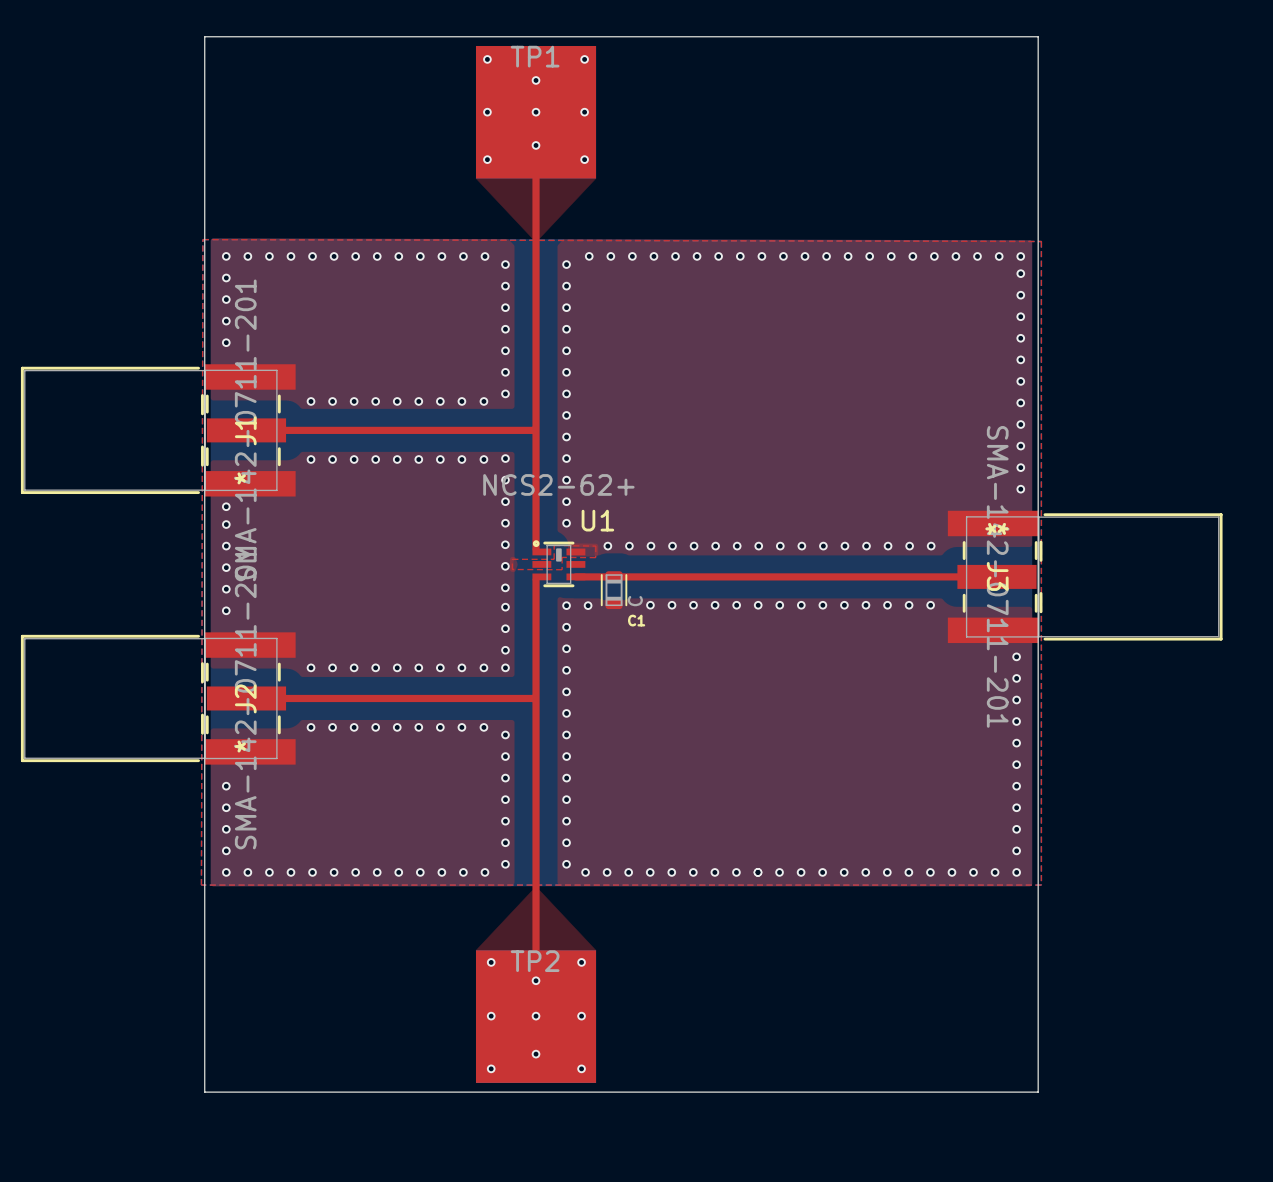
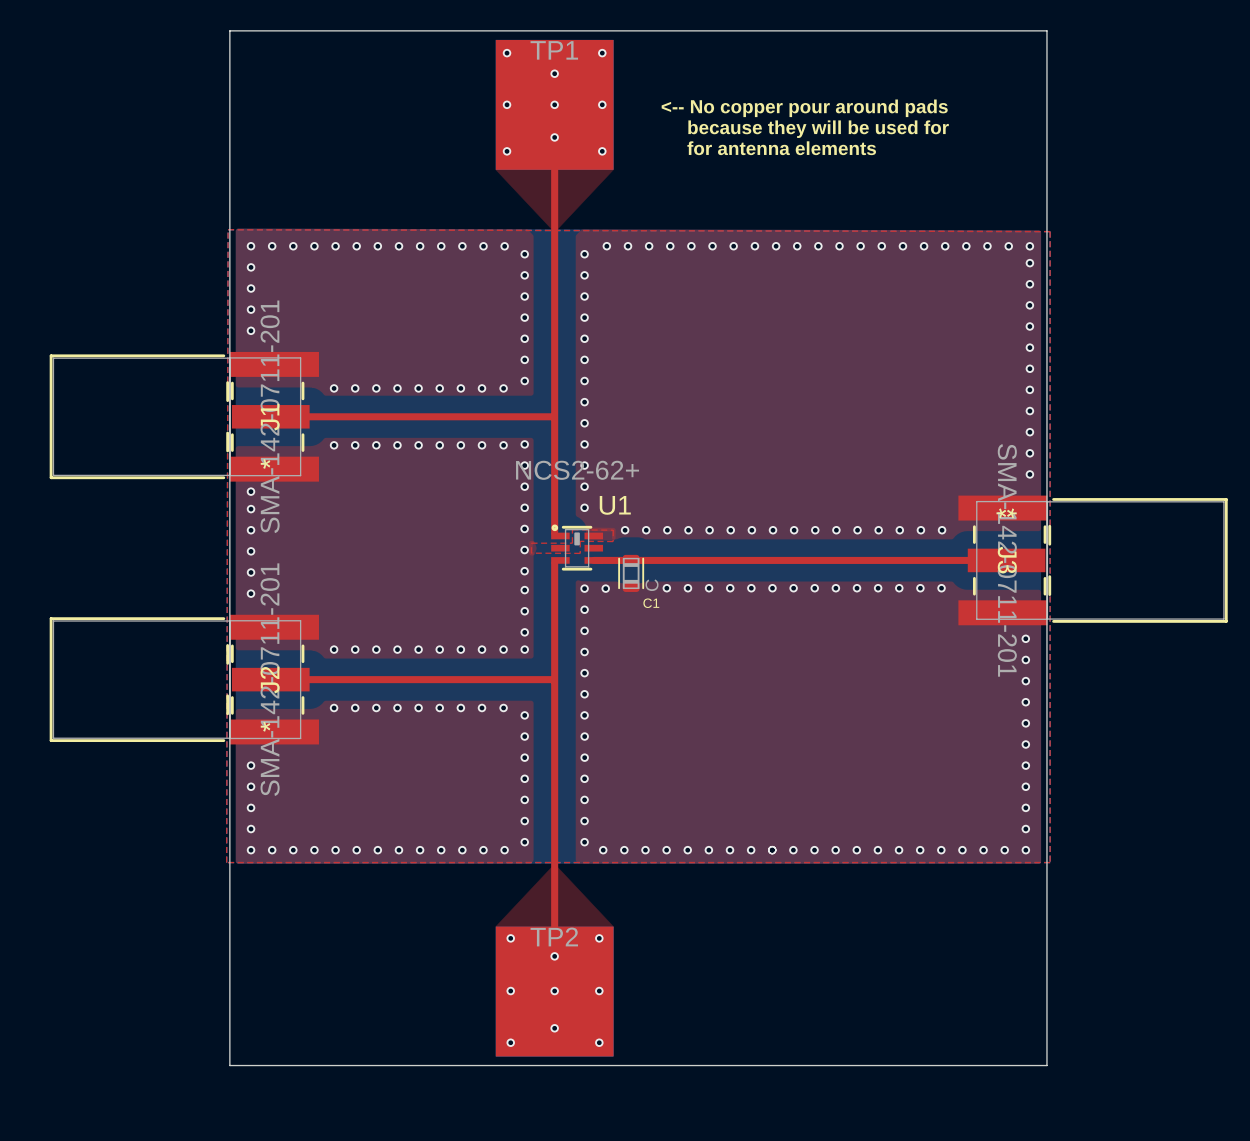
text: none -> <-- No copper pour around pads (804, 108)
text: none -> because they will be used for (818, 129)
text: none -> for antenna elements (781, 148)

